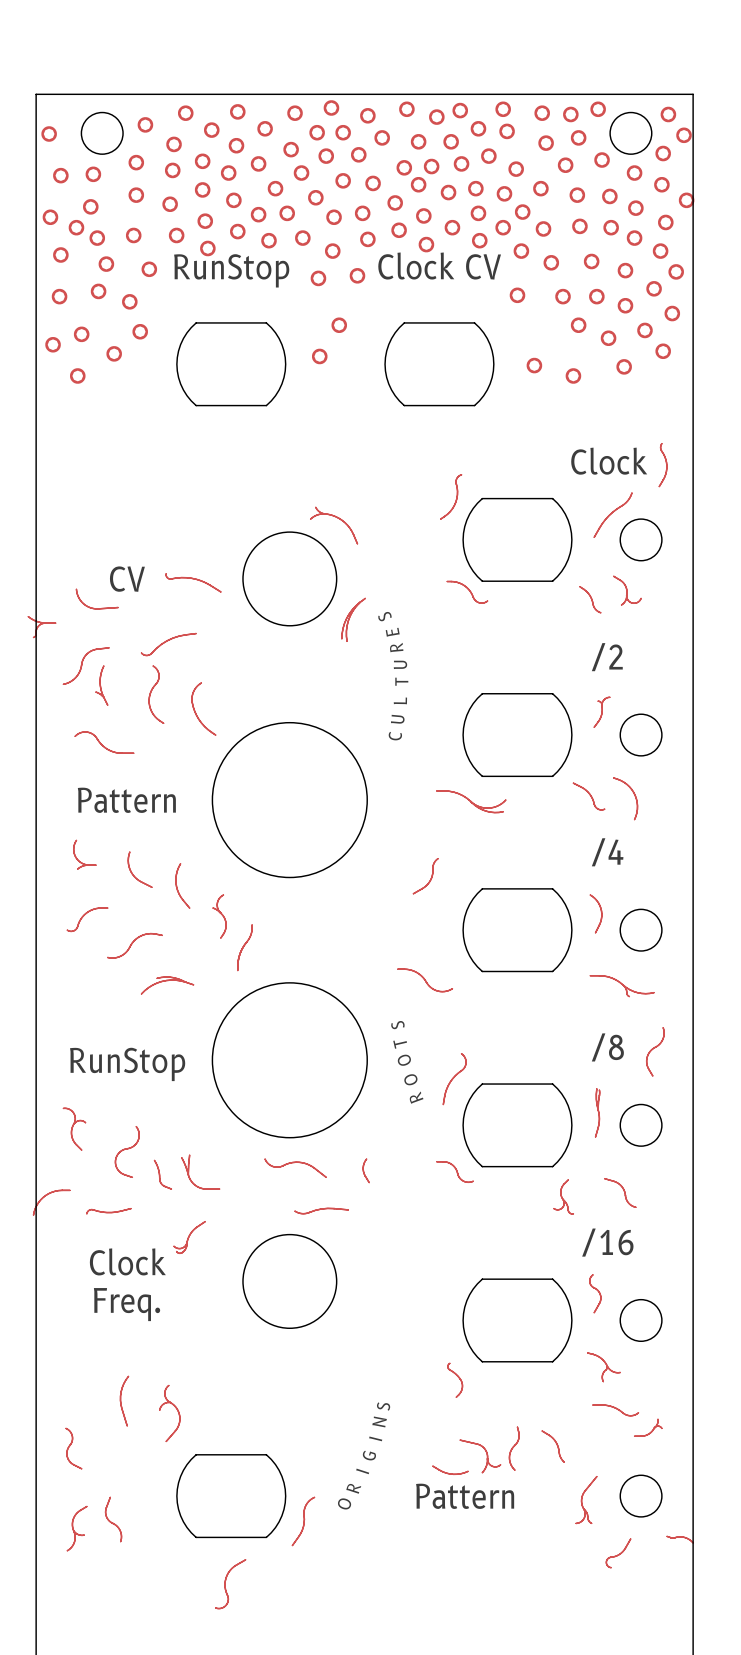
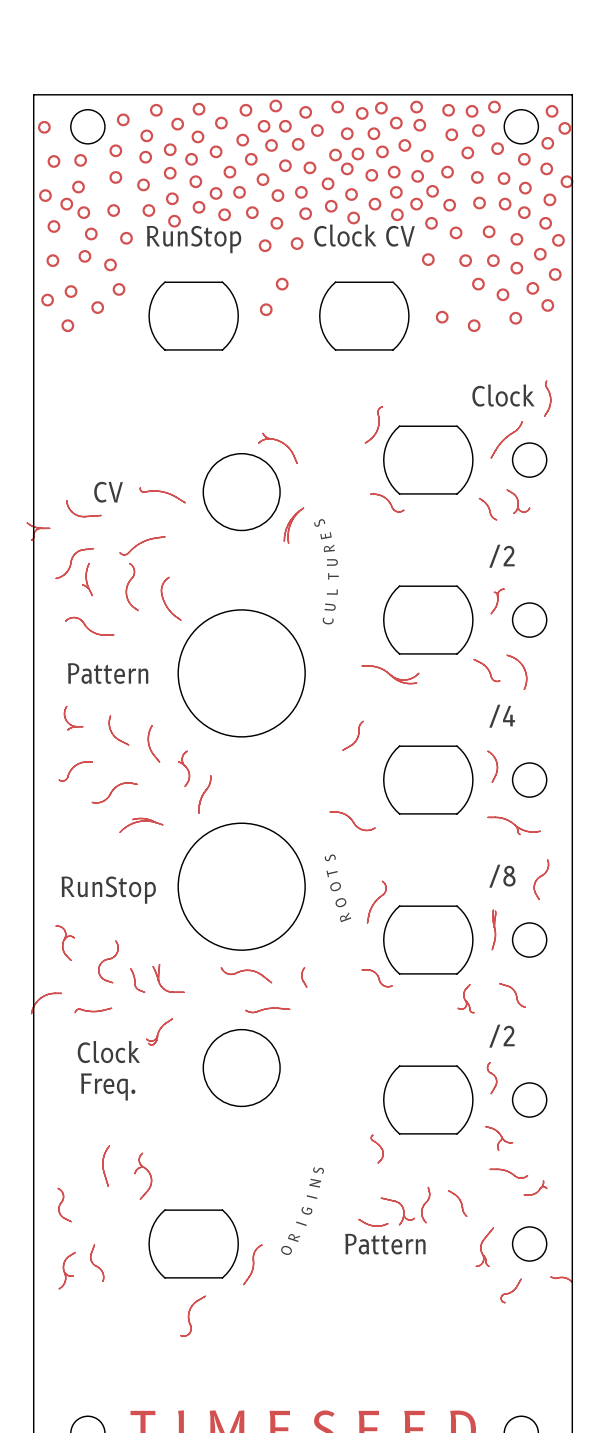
text: /16 (607, 1242) -> /2 (501, 1036)

